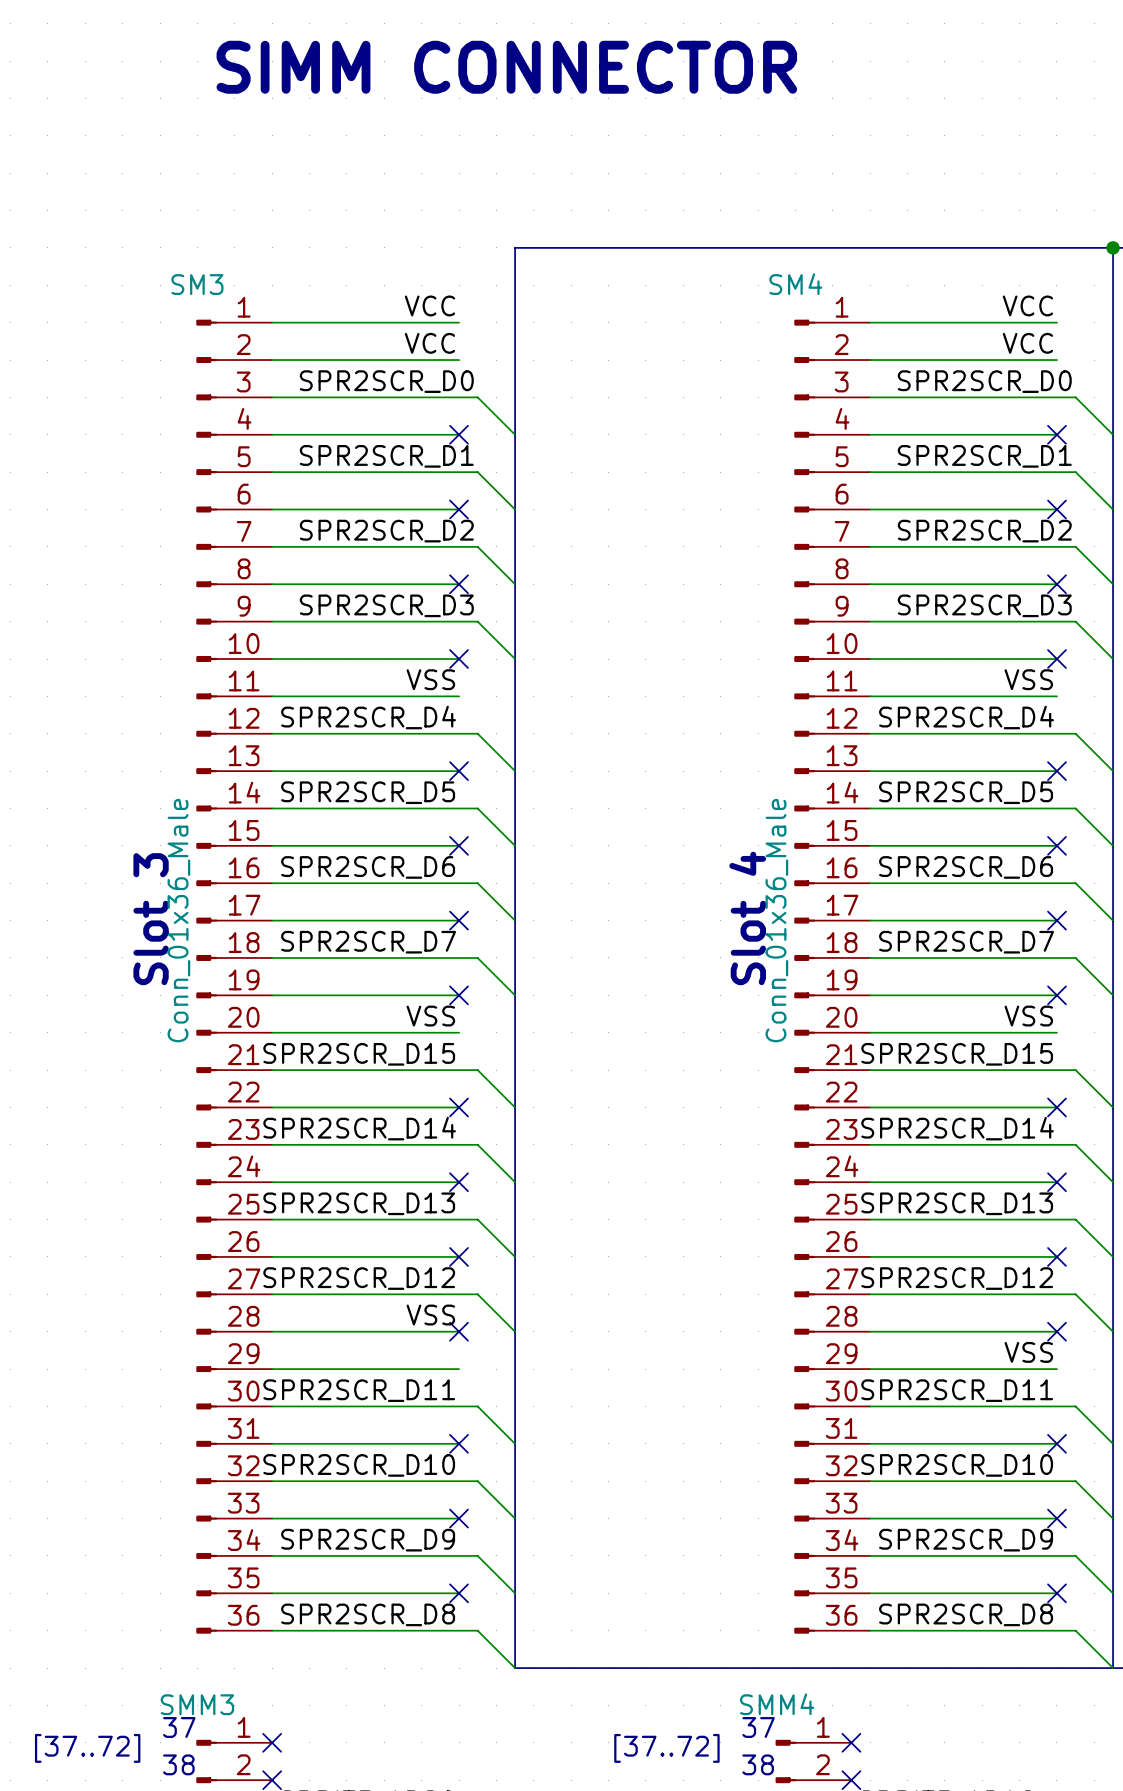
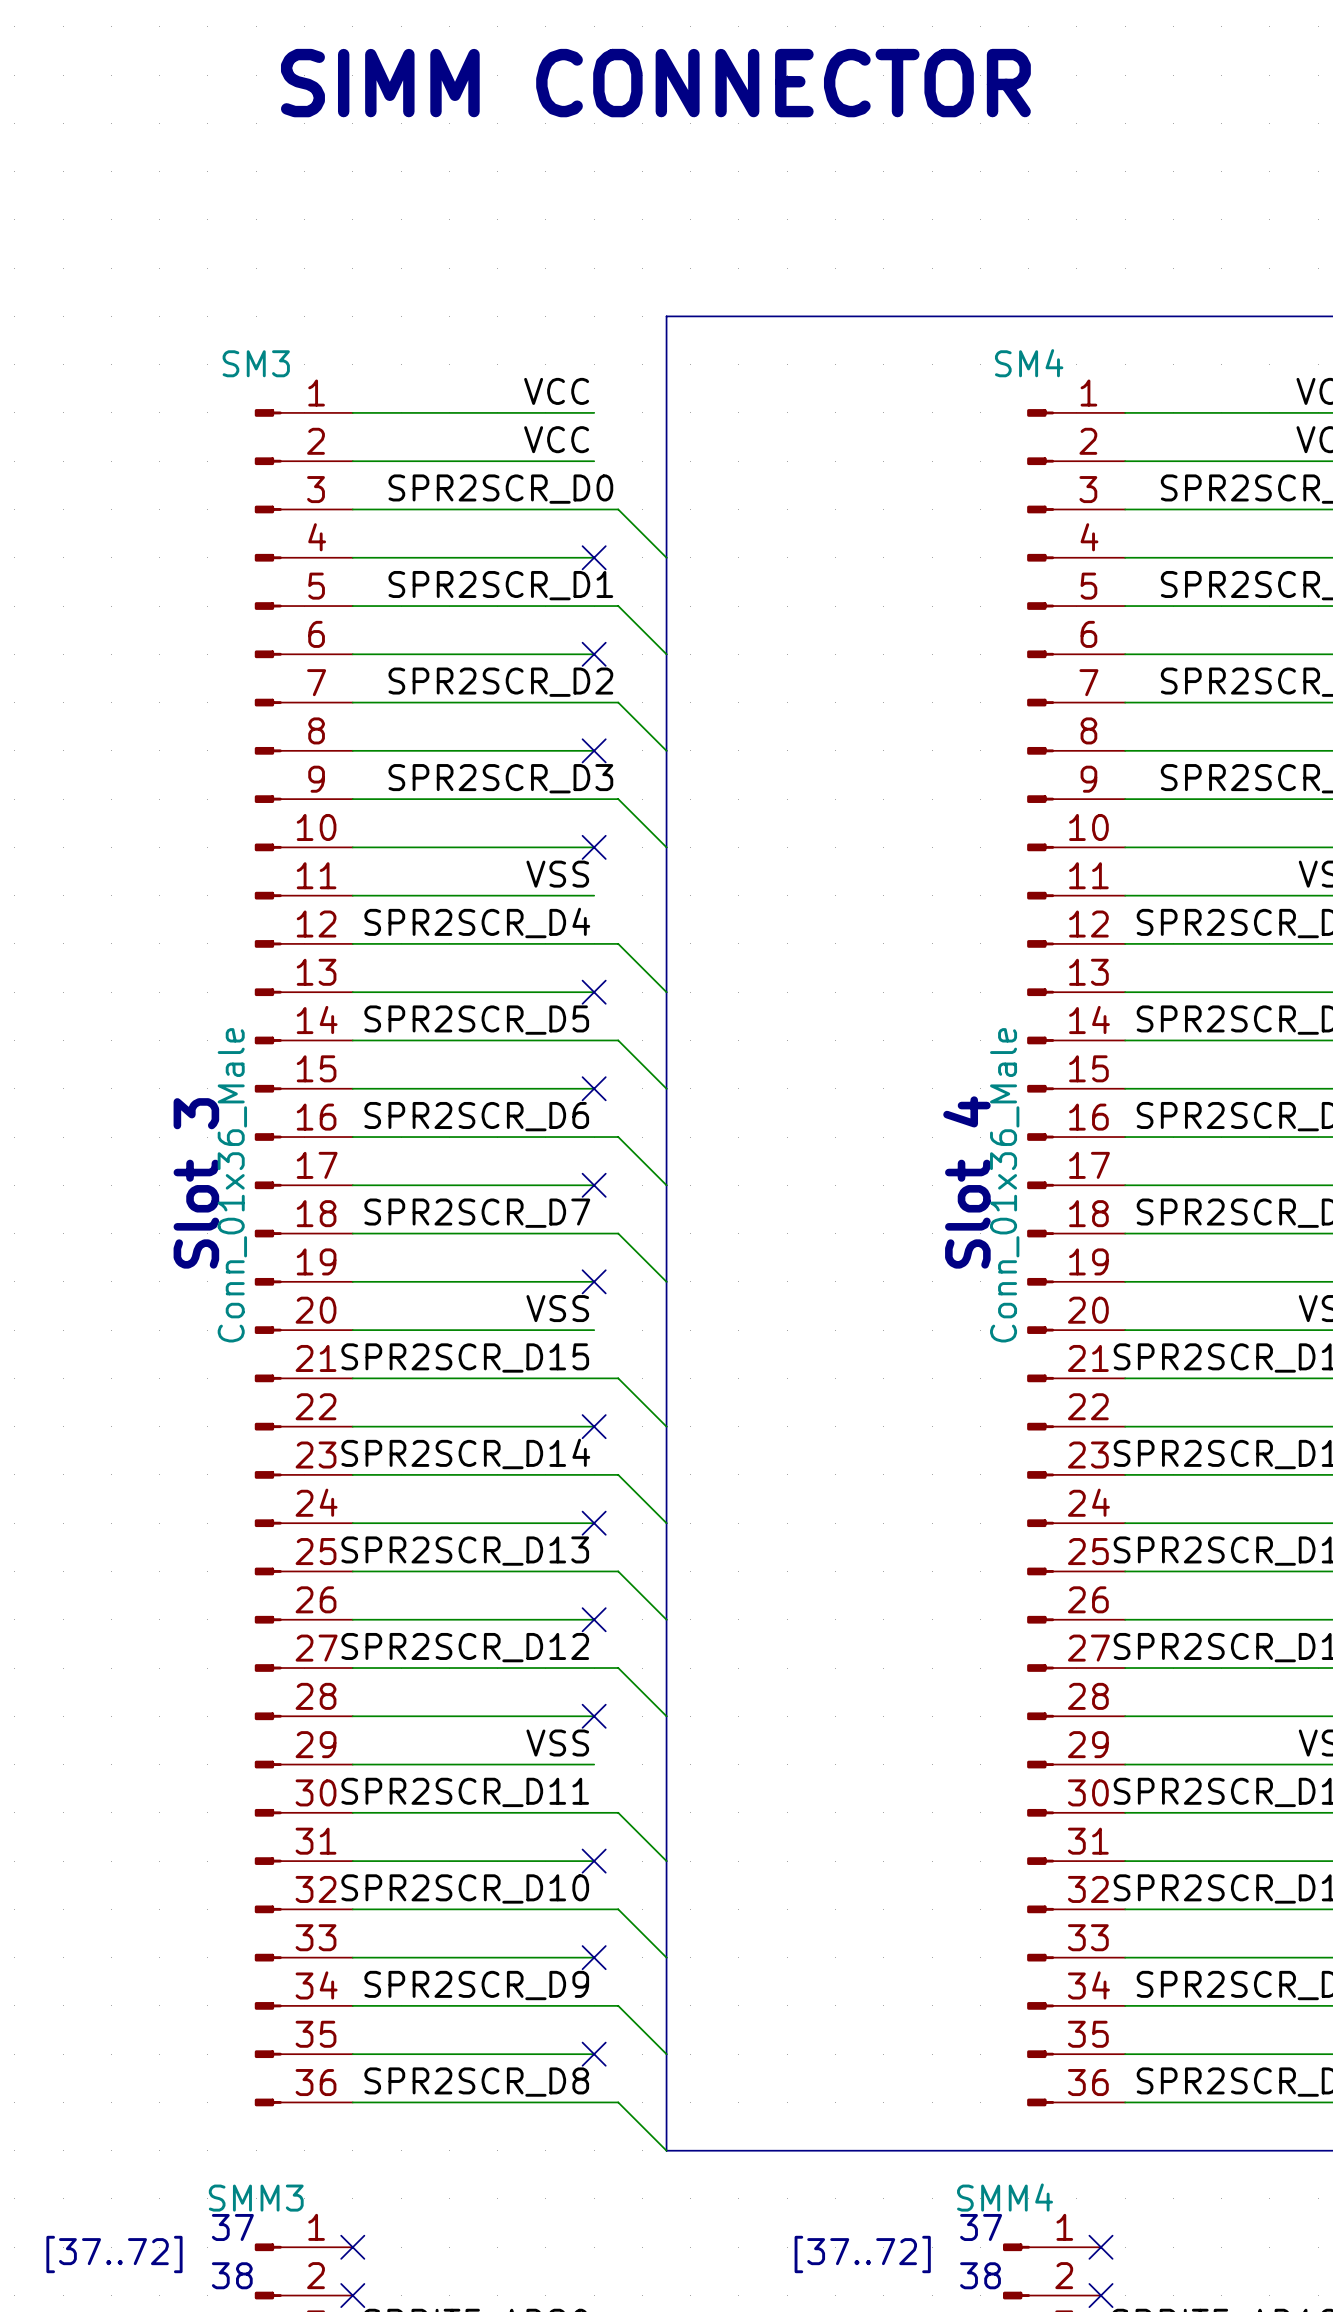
label position: VSS (430, 1315) -> VSS (557, 1743)

